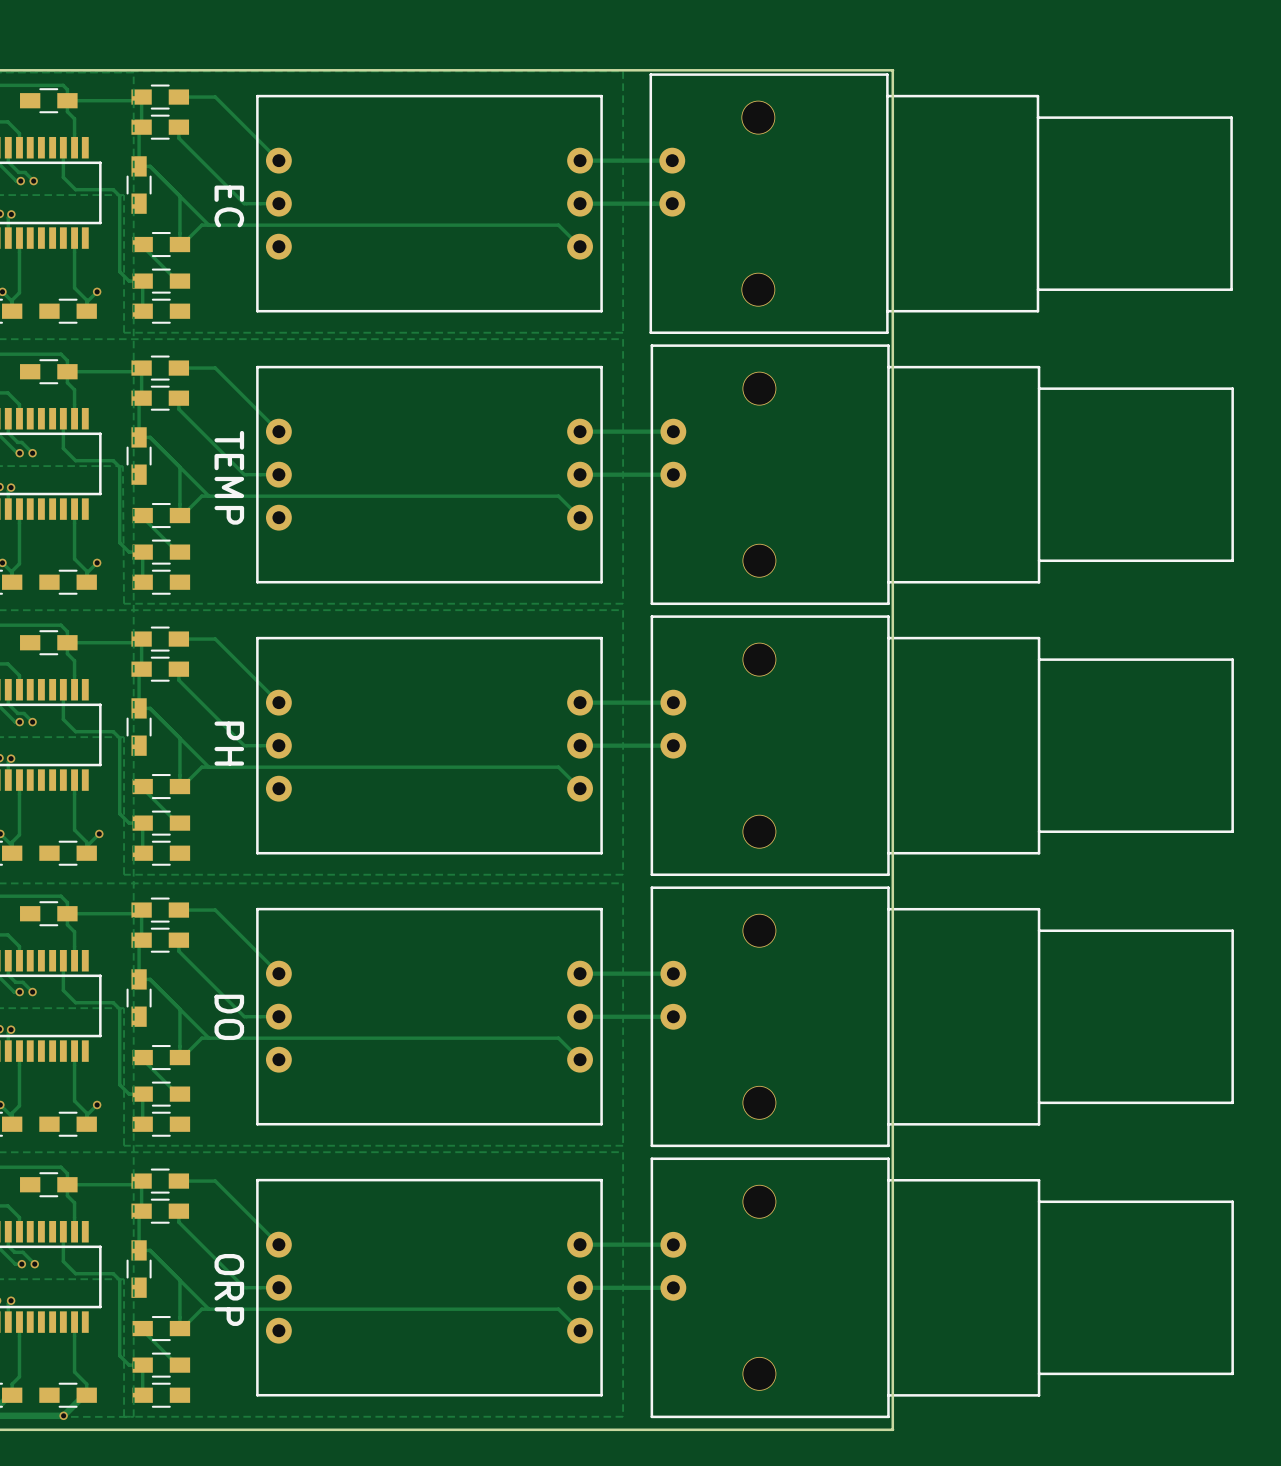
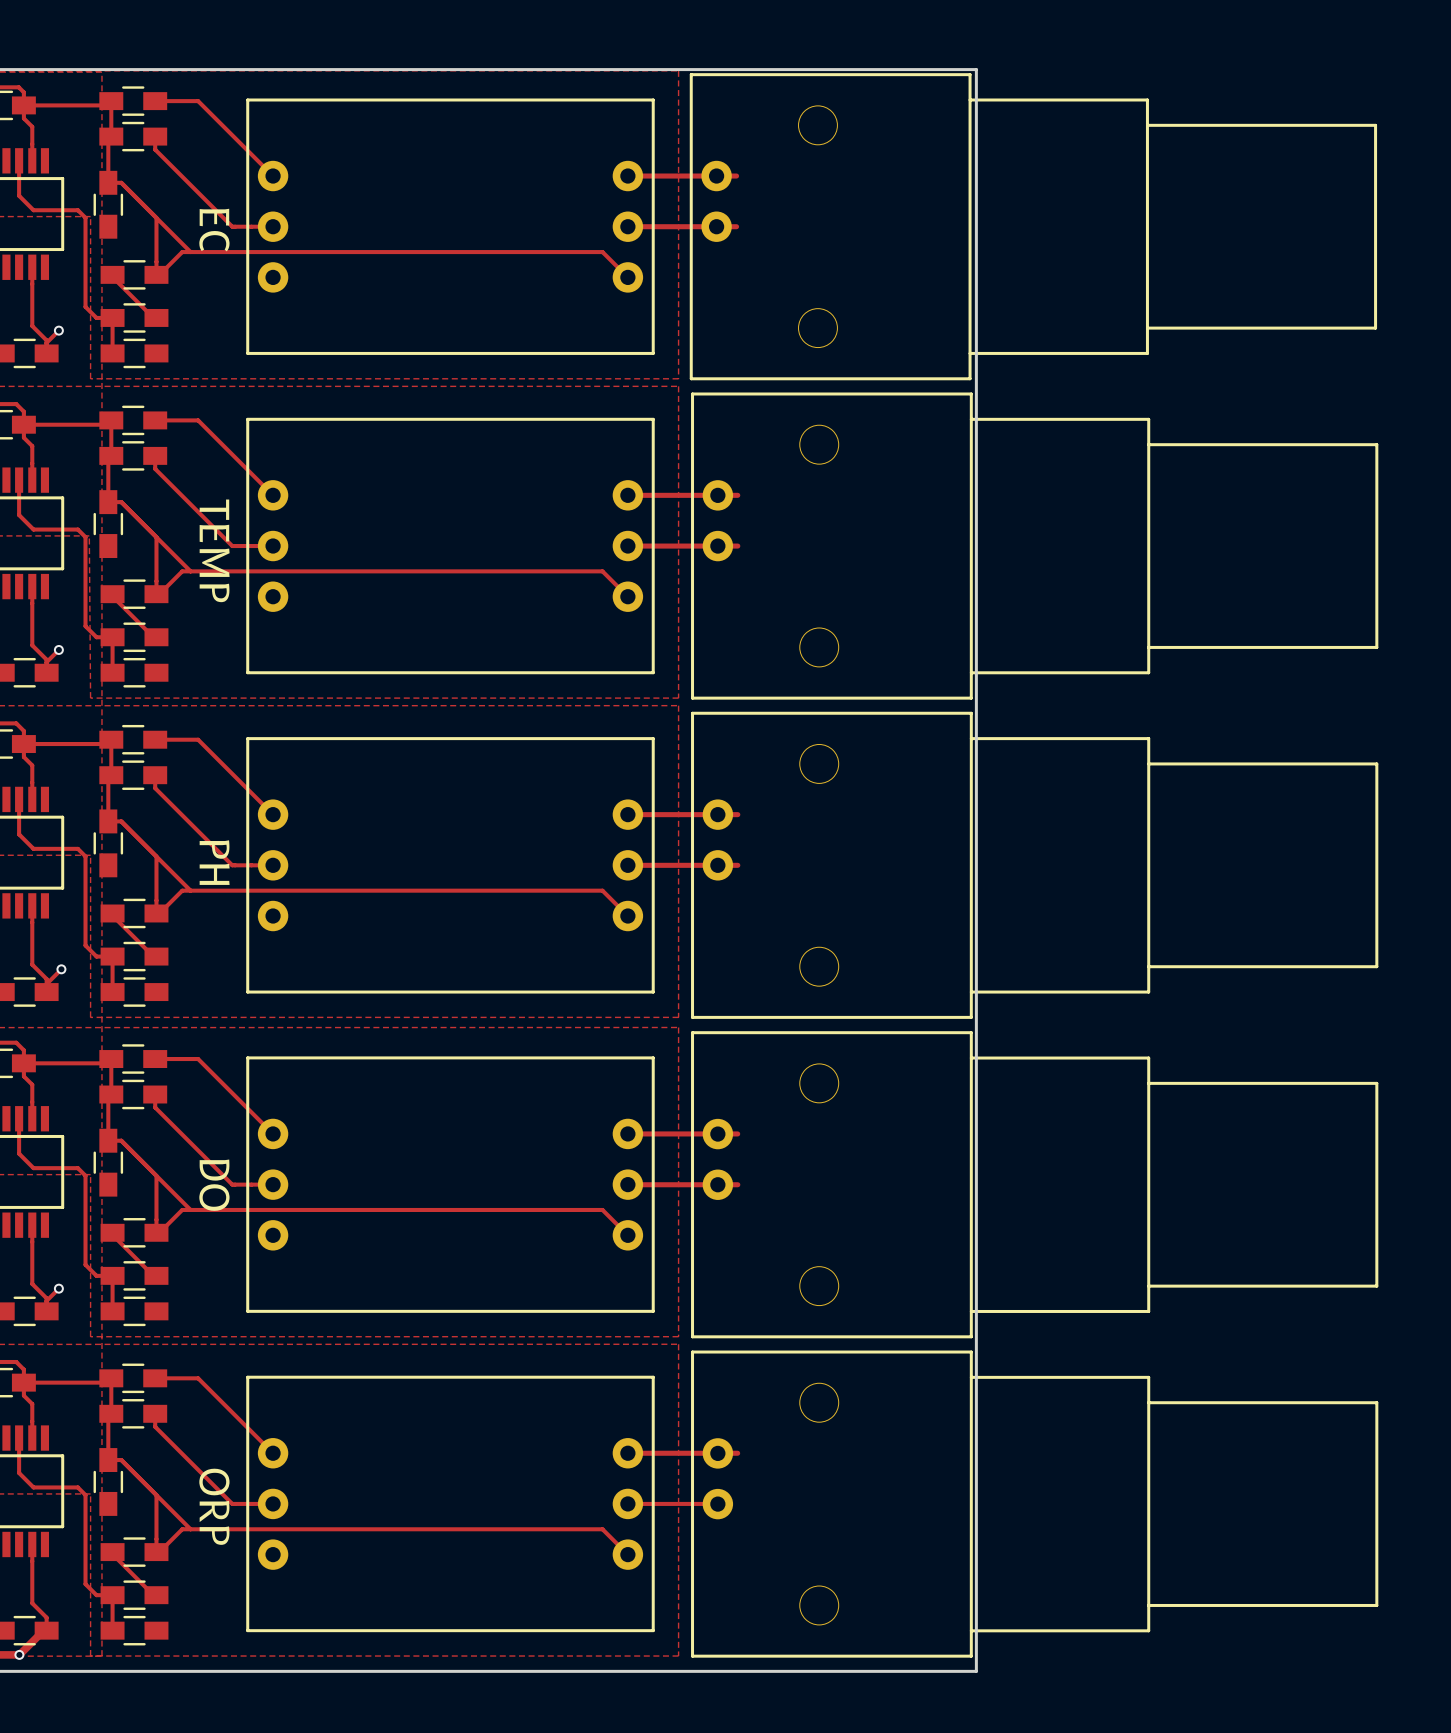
board edge: (875, 70) (893, 70) -> (976, 69) (976, 1671)
board edge: (892, 70) (892, 1429) -> none
part position: (941, 203) -> (1033, 226)
part position: (942, 474) -> (1034, 546)
part position: (942, 745) -> (1034, 865)
part position: (942, 1016) -> (1034, 1184)
track: (580, 1287) (673, 1287) -> (627, 1503) (716, 1503)
part position: (942, 1287) -> (1034, 1504)
board edge: (875, 1429) (893, 1429) -> none

